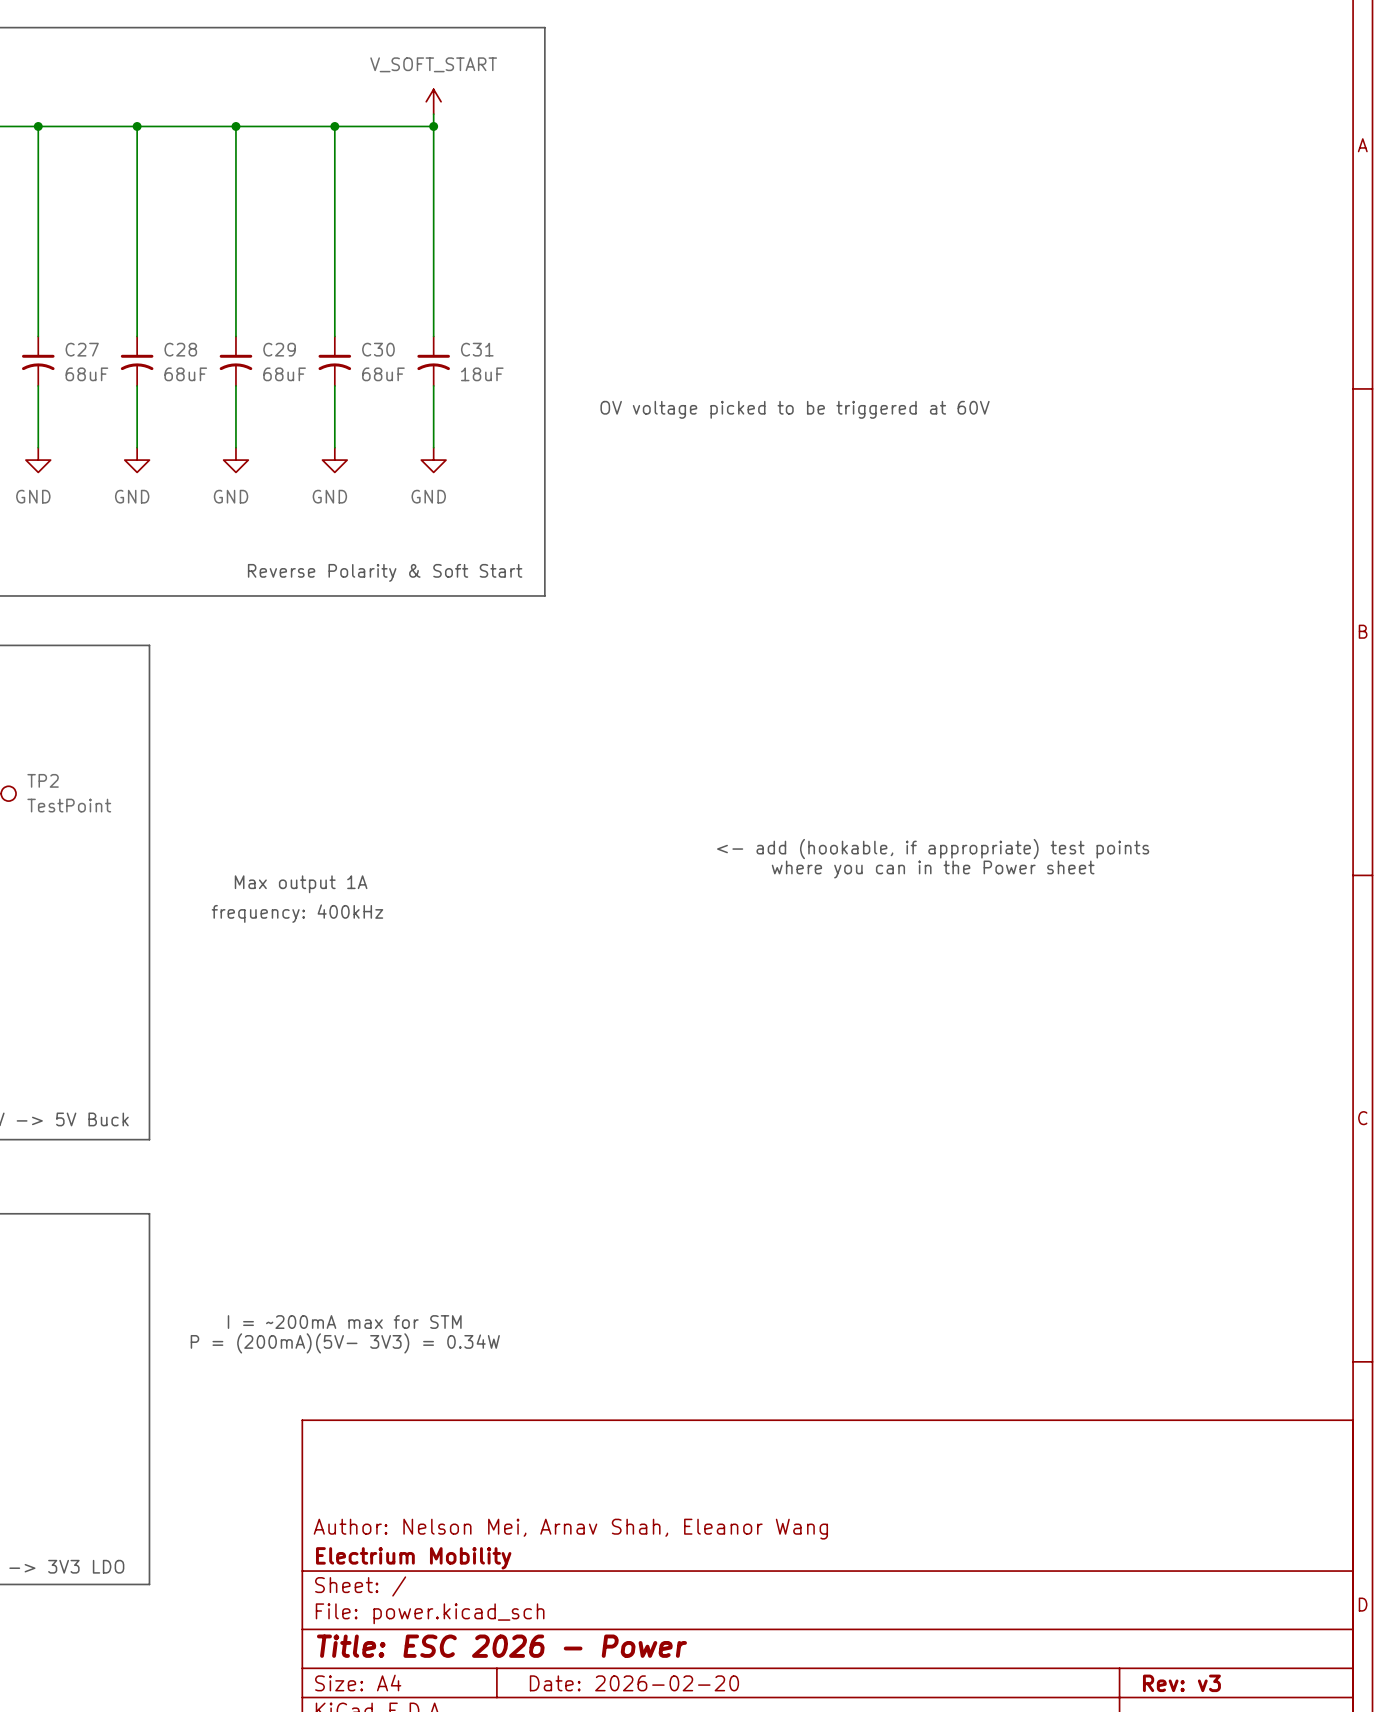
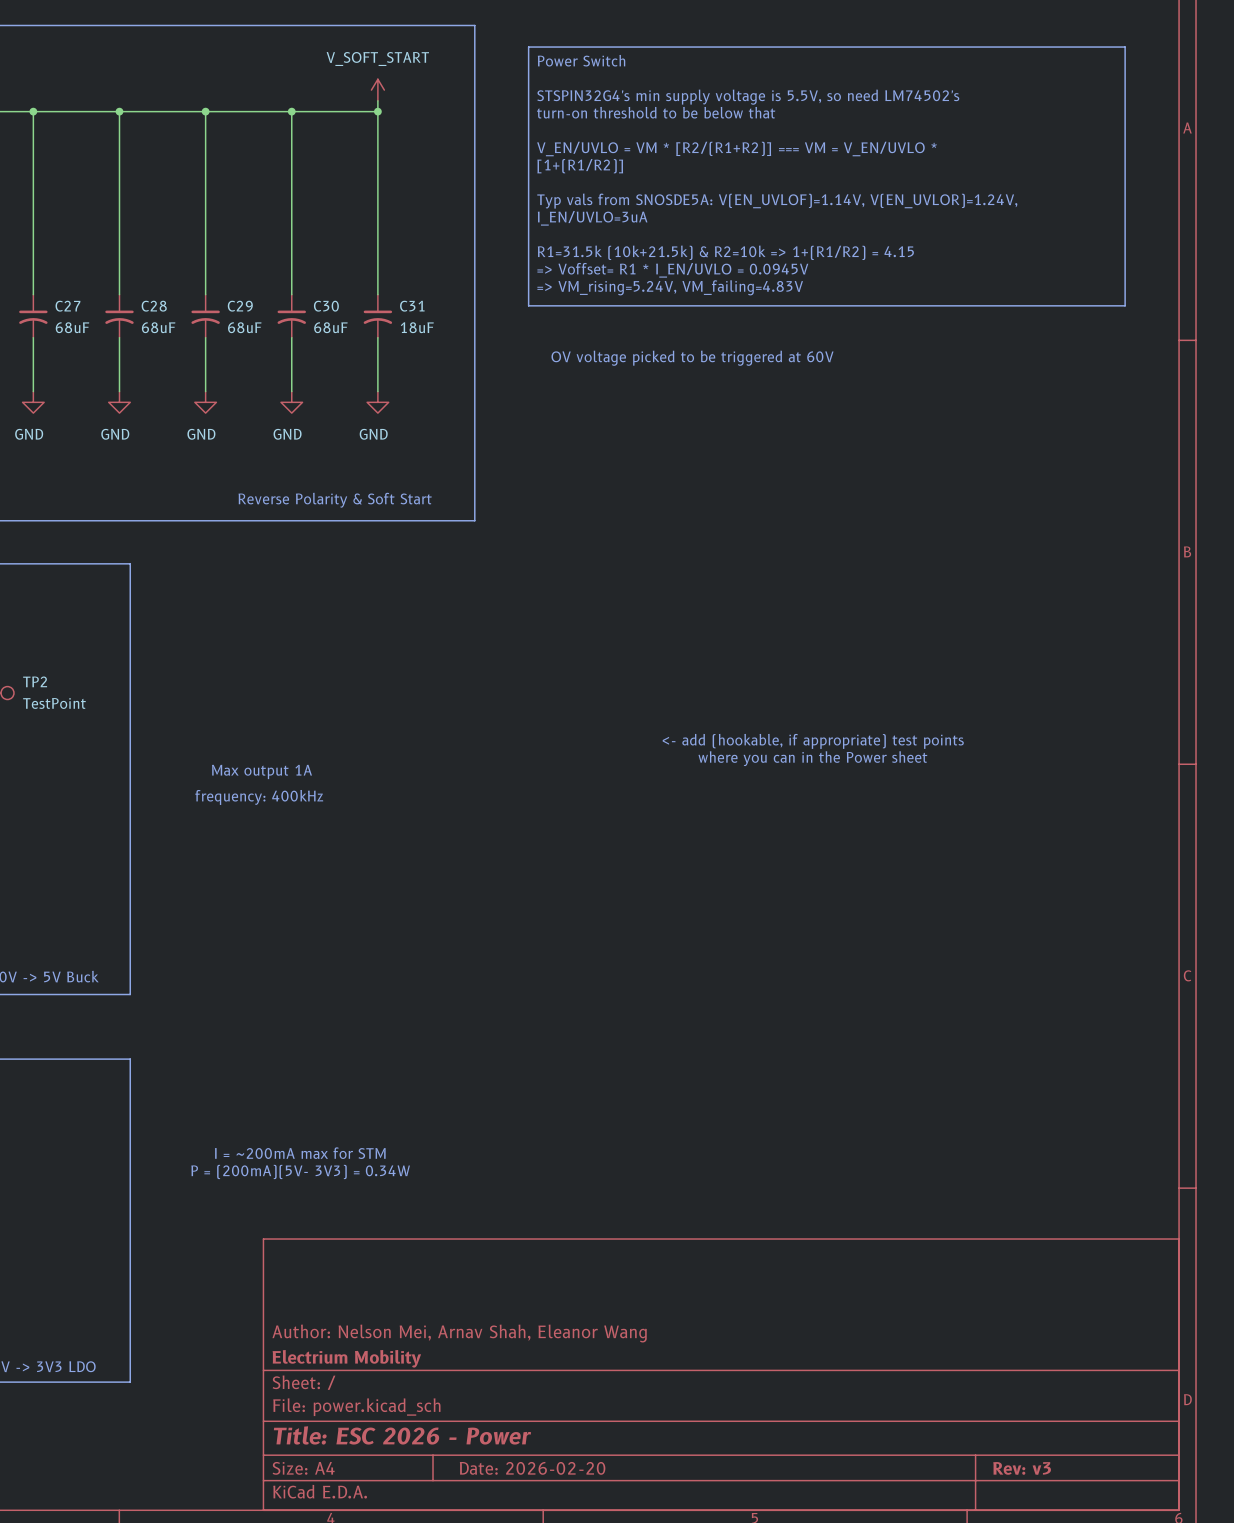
line: none -> (528, 47) (1125, 47) (1125, 305) (528, 305) (528, 47)
text: none -> Power Switch (581, 60)
text: none -> STSPIN32G4's min supply voltage is 5.5V, so need LM74502's (748, 97)
text: none -> turn-on threshold to be below that (656, 112)
text: none -> V_EN/UVLO = VM * [R2/(R1+R2)] === VM = V_EN/UVLO * (737, 149)
text: none -> [1+(R1/R2)] (580, 166)
text: none -> Typ vals from SNOSDE5A: V(EN_UVLOF)=1.14V, V(EN_UVLOR)=1.24V, (777, 201)
text: none -> I_EN/UVLO=3uA (592, 218)
text: none -> R1=31.5k (10k+21.5k) & R2=10k => 1+(R1/R2) = 4.15 (725, 252)
text: none -> => Voffset= R1 * I_EN/UVLO = 0.0945V (672, 270)
text: none -> => VM_rising=5.24V, VM_failing=4.83V (670, 287)

